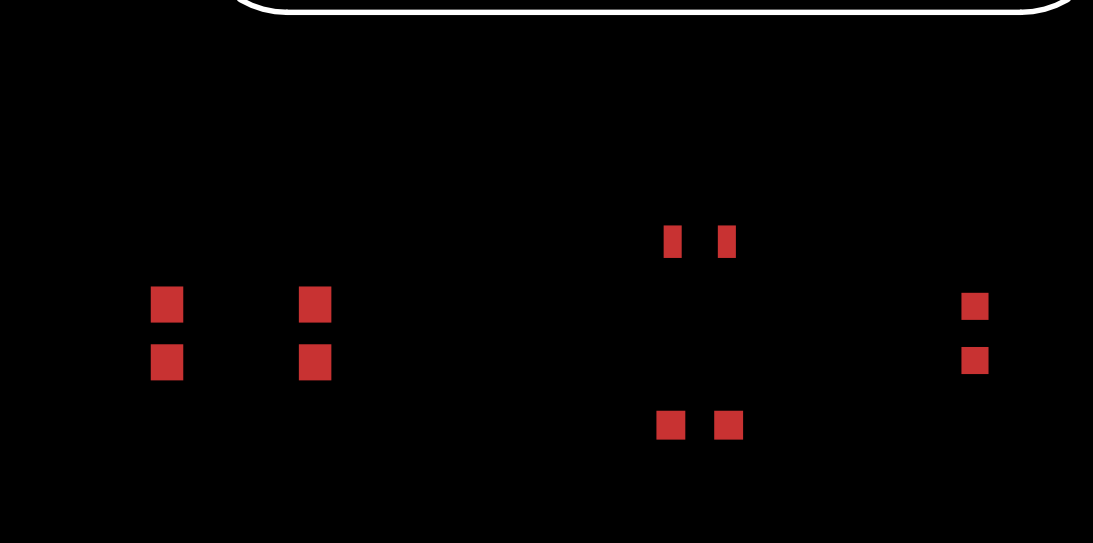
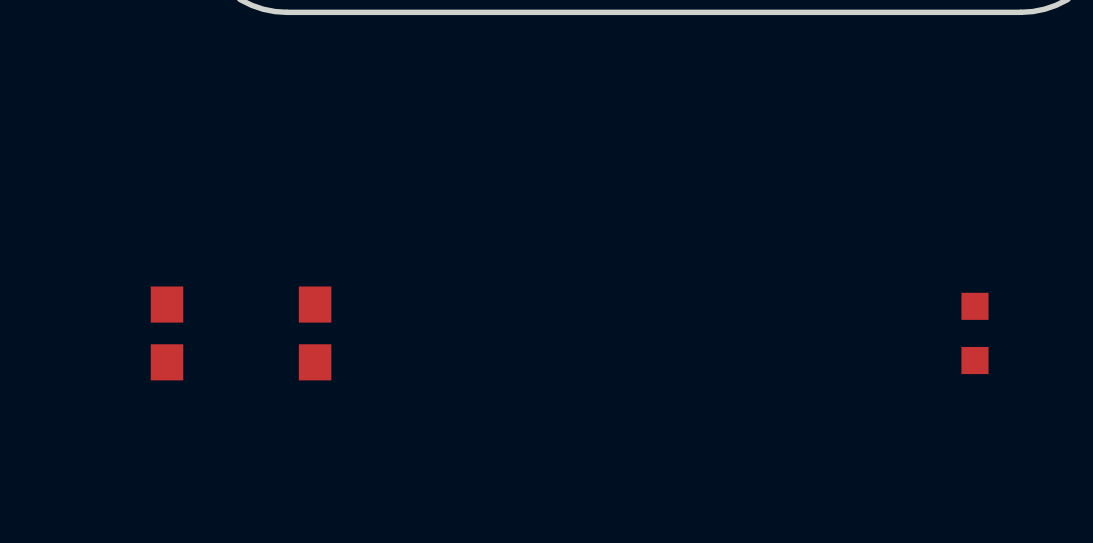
part: (699, 241) -> none
part: (699, 425) -> none

